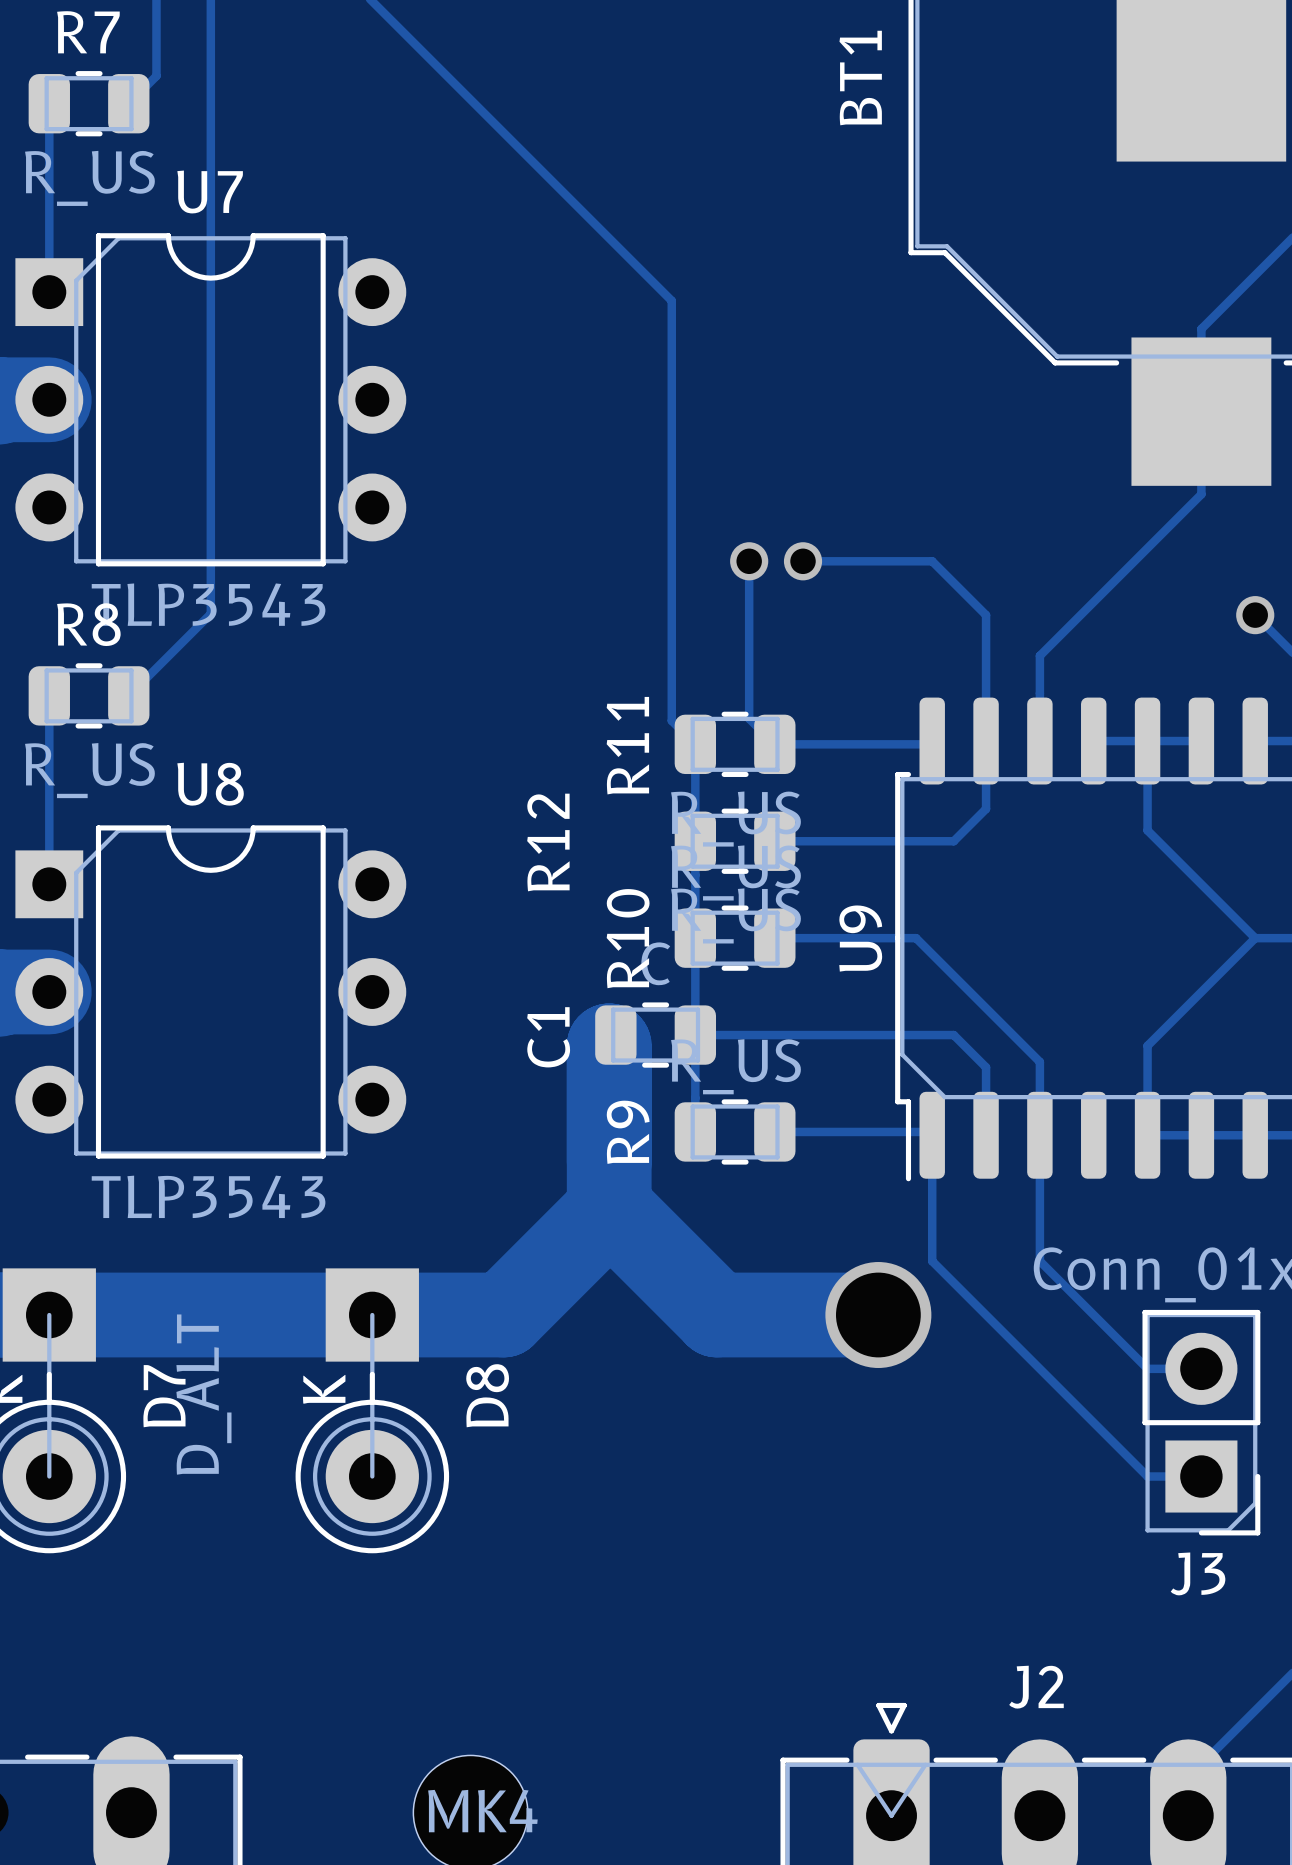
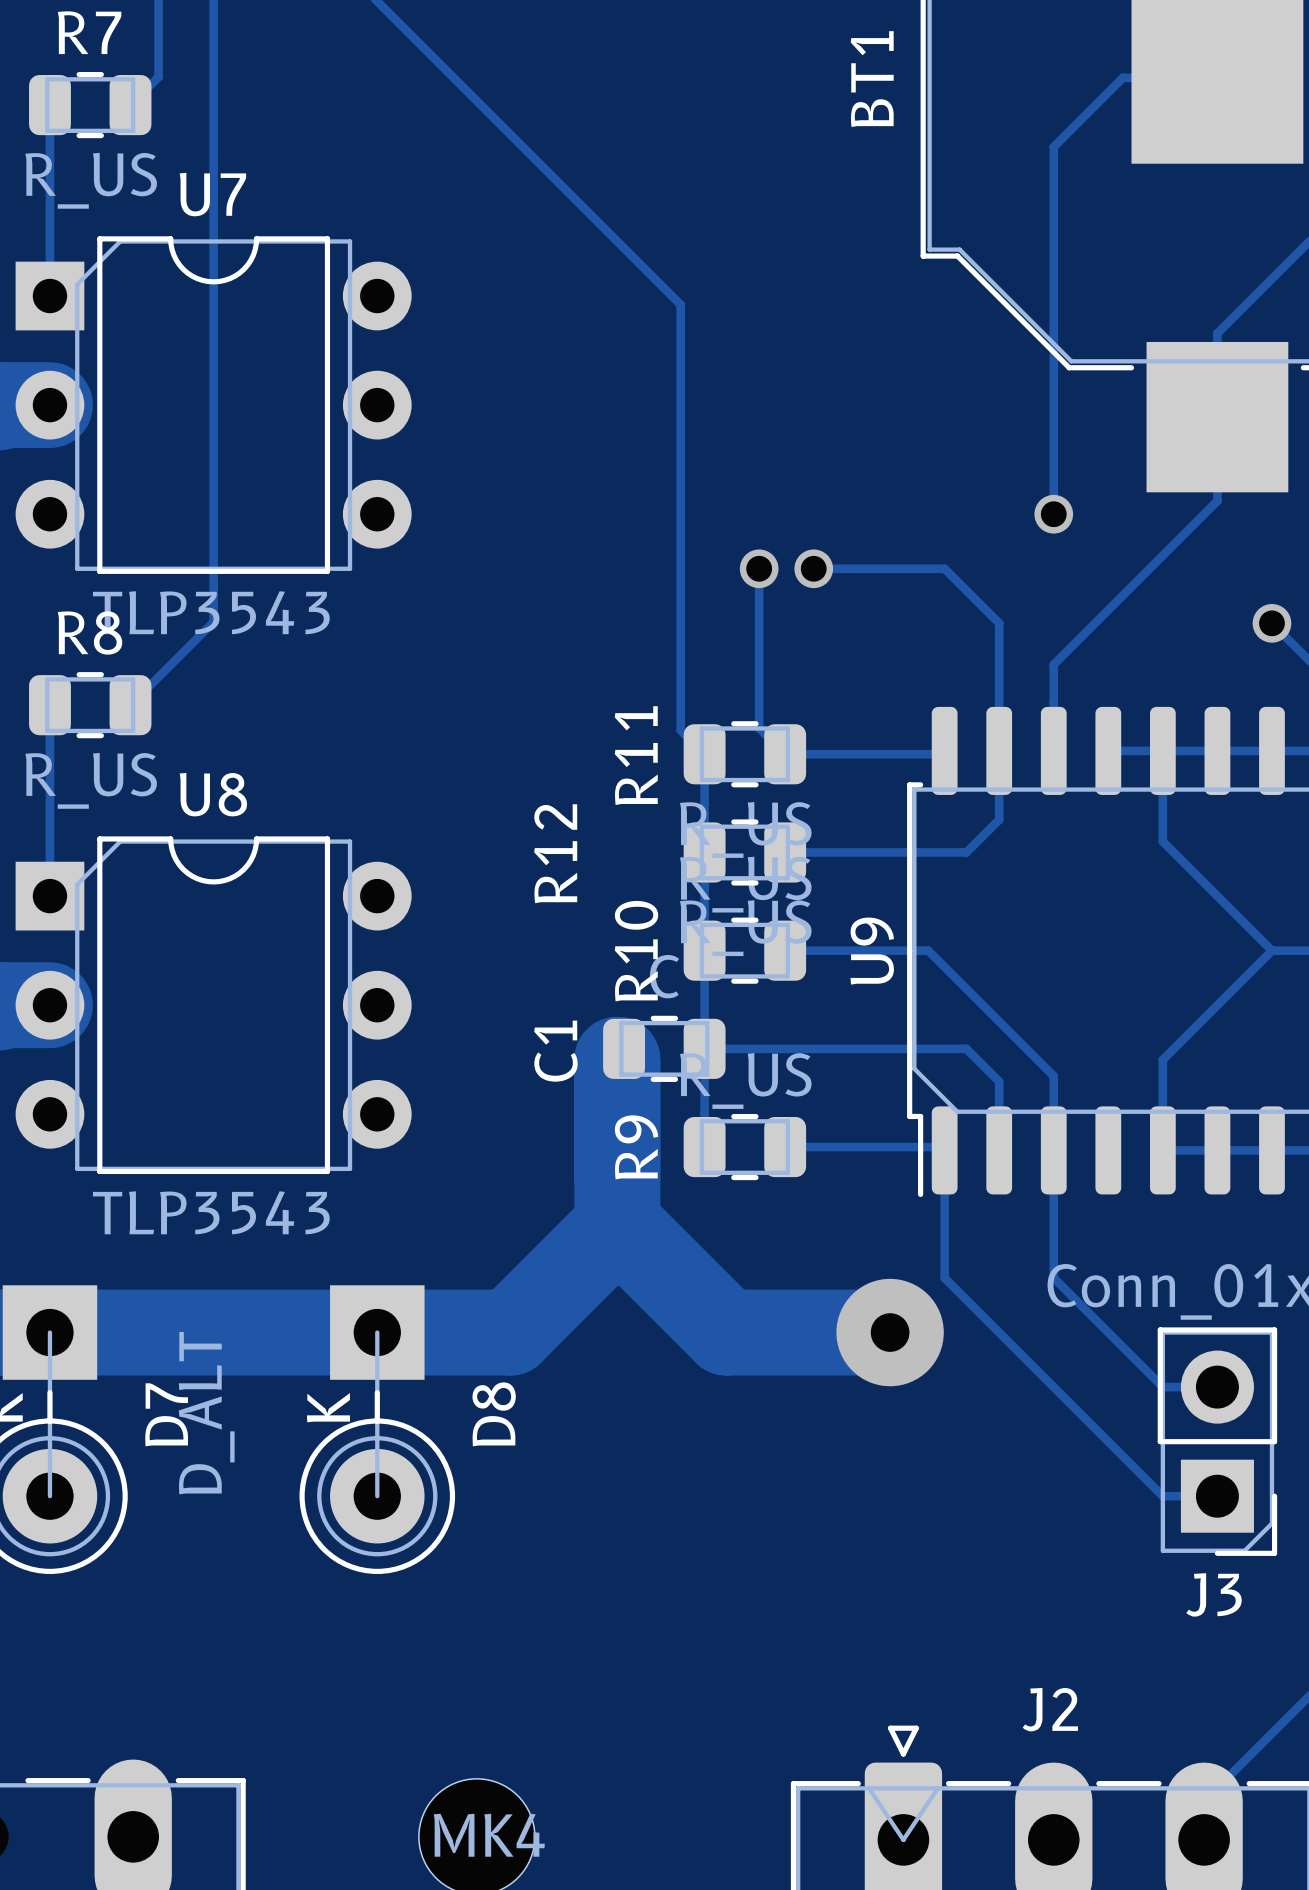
track: none -> (1217, 77) (1122, 77) (1053, 146) (1053, 514)
via: none -> (1053, 514)
track: none -> (1217, 750) (1271, 750)
via: (878, 1315) -> none
via: none -> (890, 1332)

